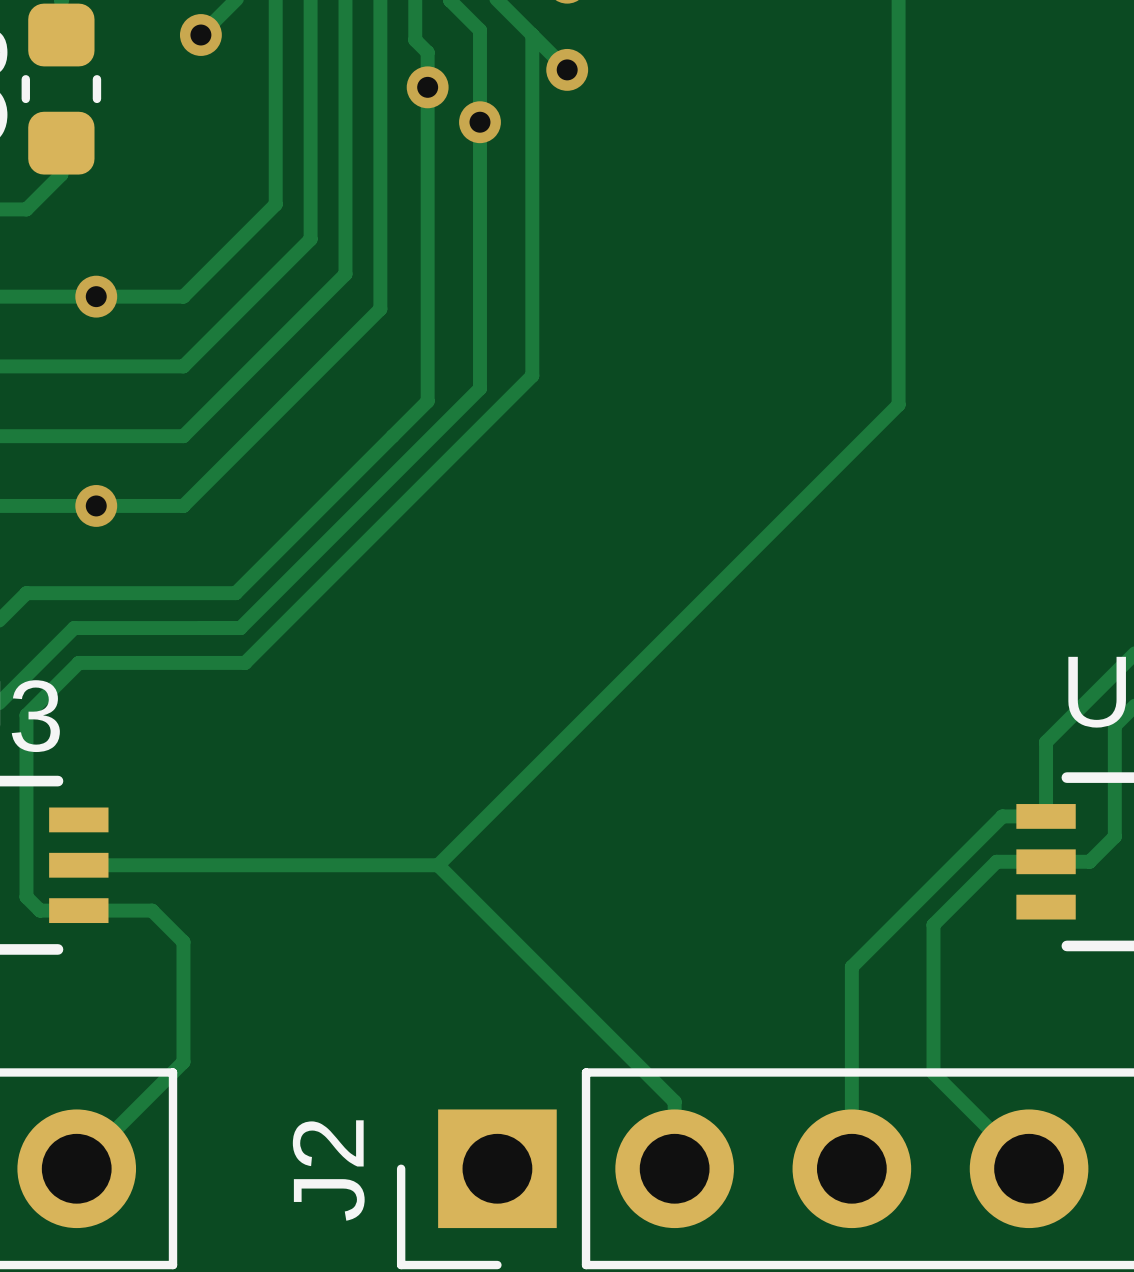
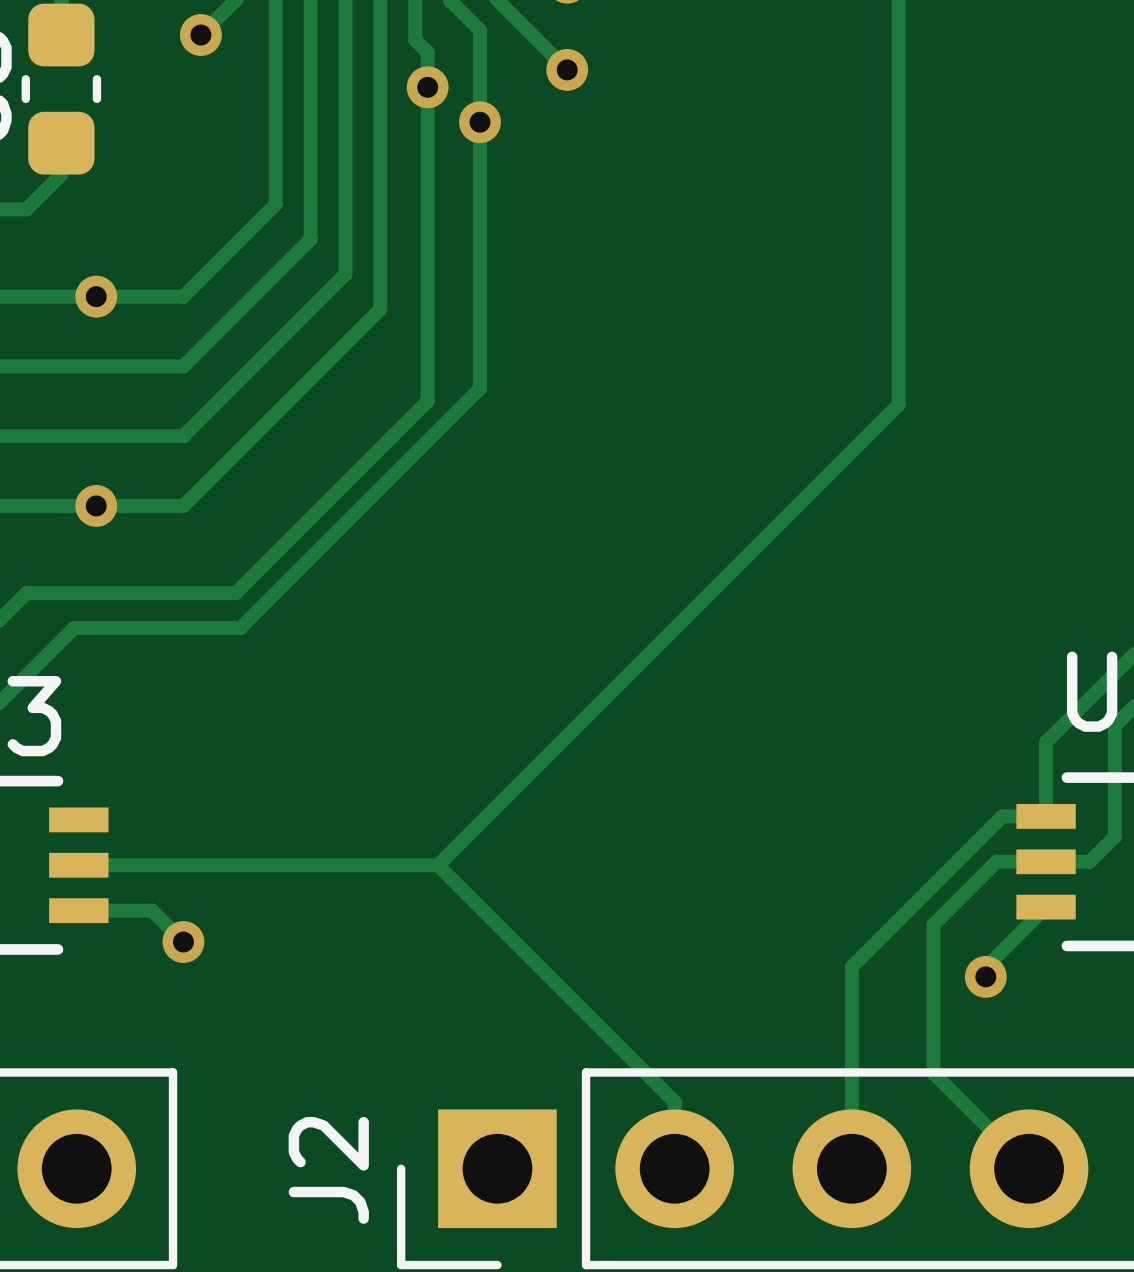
track: (532, 35) (532, 375) (245, 662) (78, 662) (26, 715) (26, 897) (40, 910) (78, 910) -> none
track: none -> (1046, 907) (985, 967) (985, 976)
track: (183, 942) (183, 1062) (76, 1168) -> none
via: none -> (183, 942)
via: none -> (985, 976)

